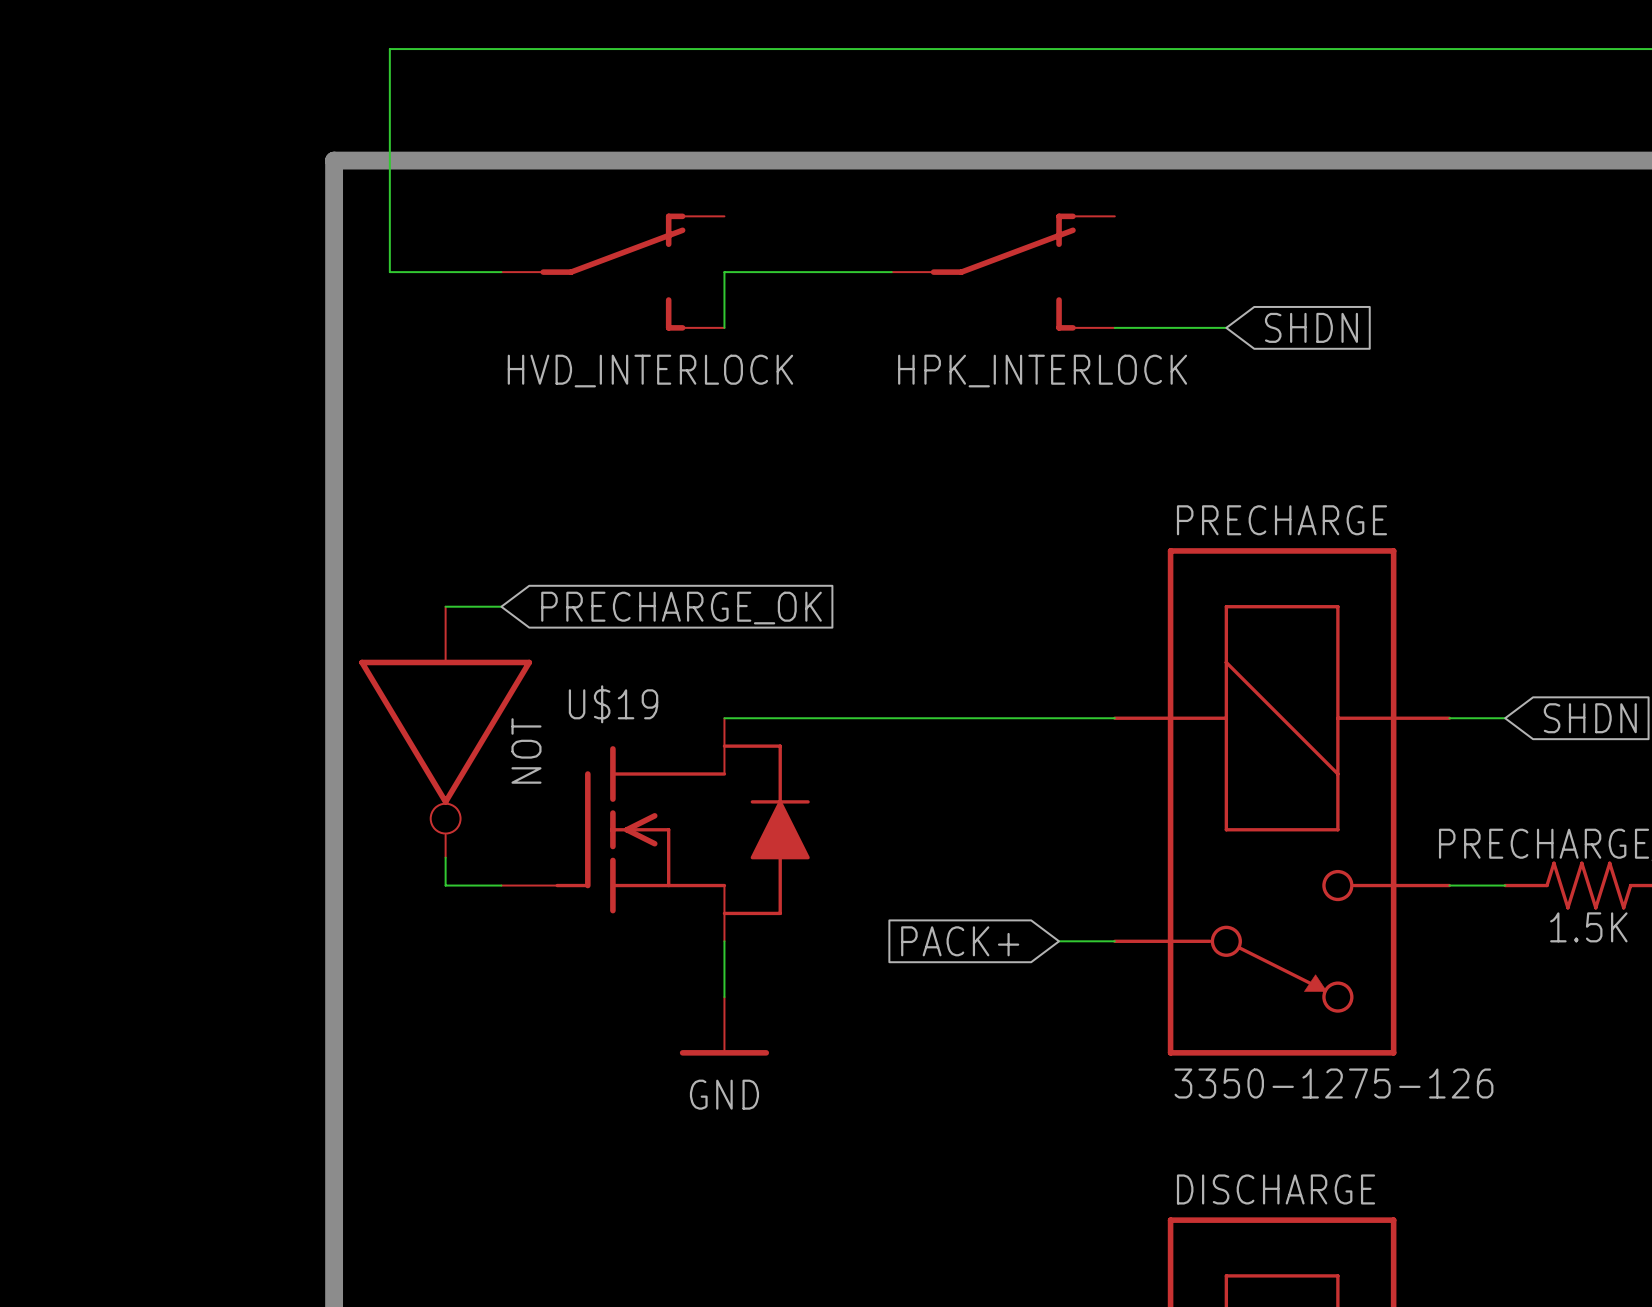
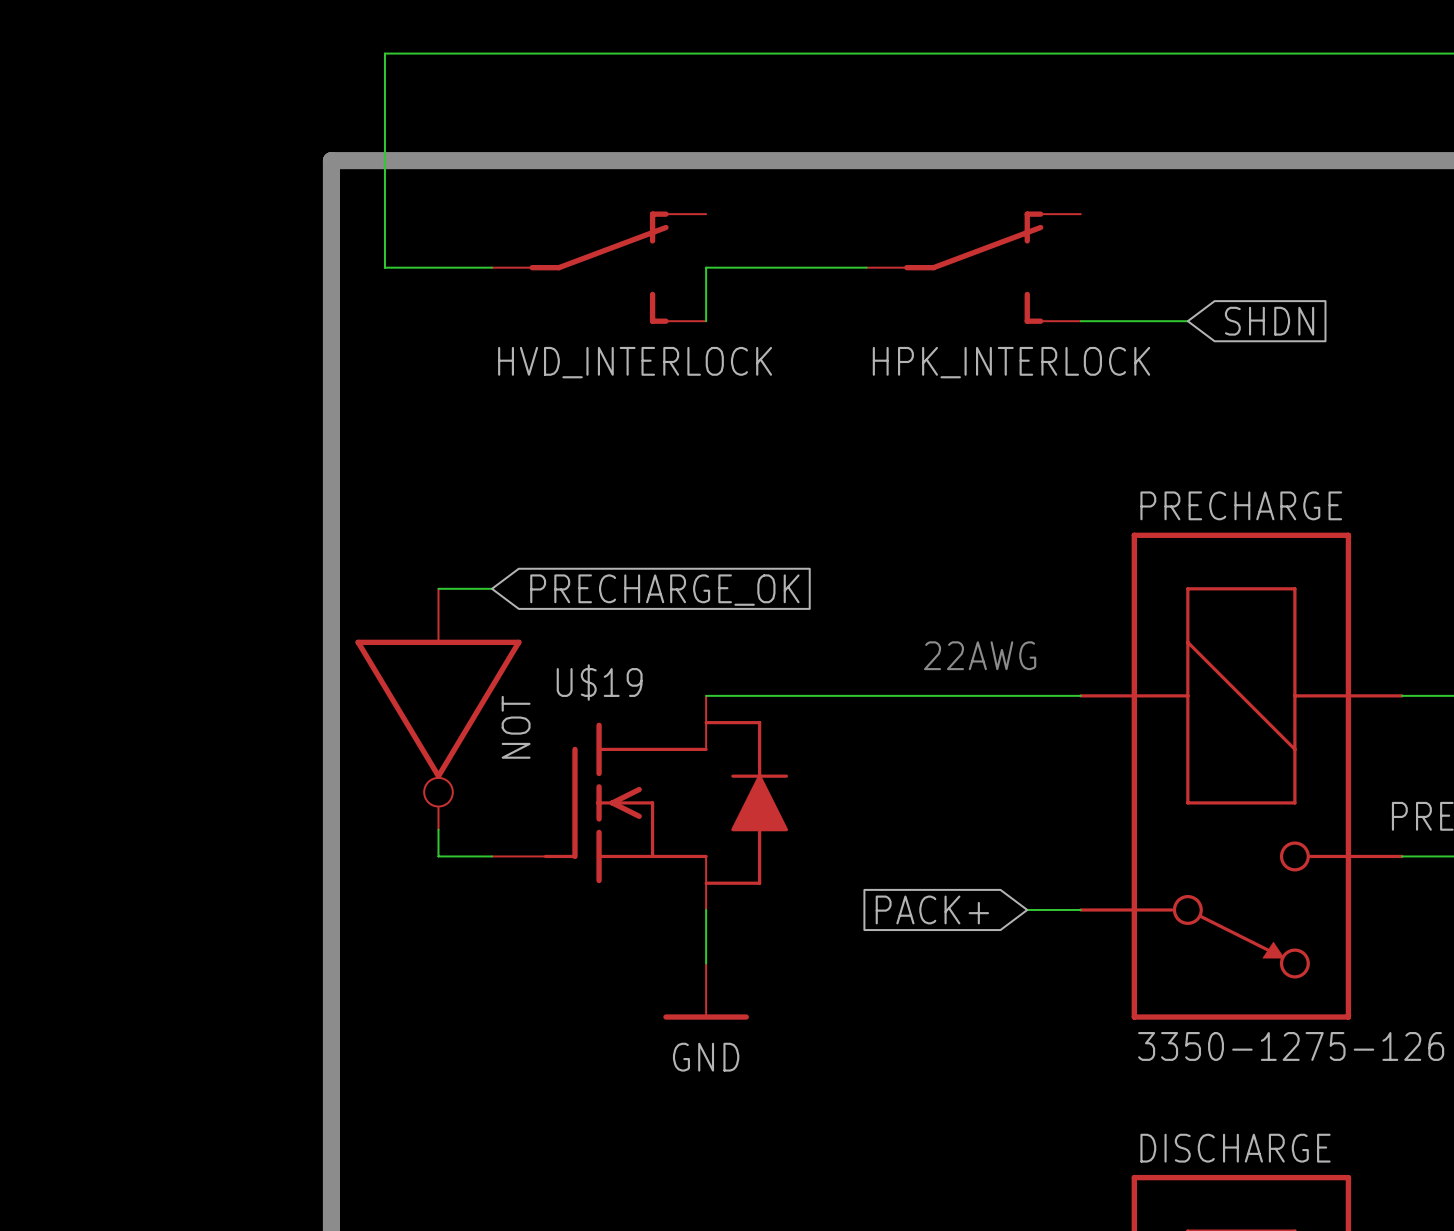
text: none -> 22AWG (980, 655)

